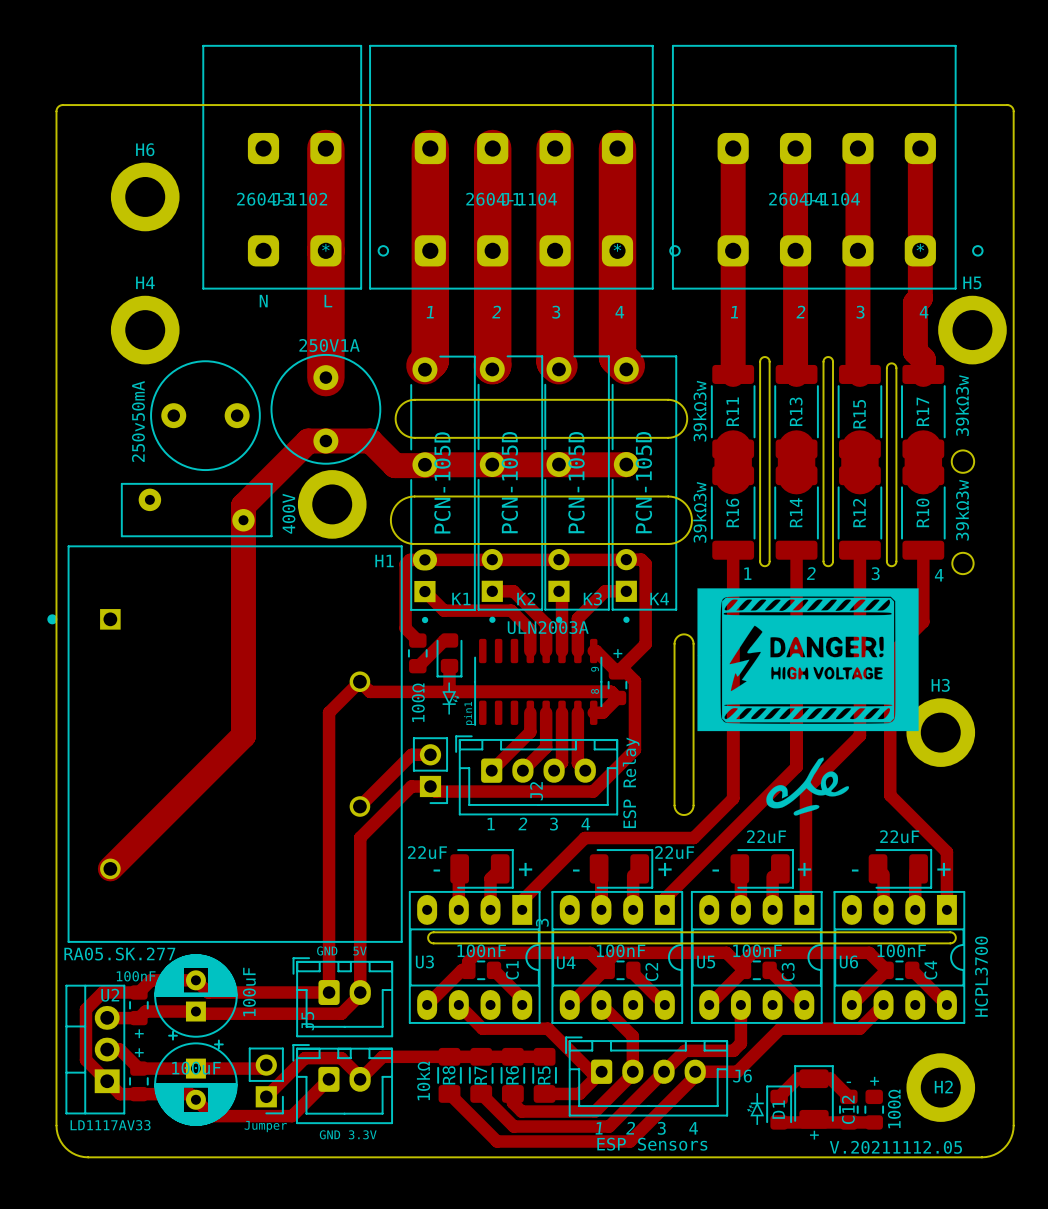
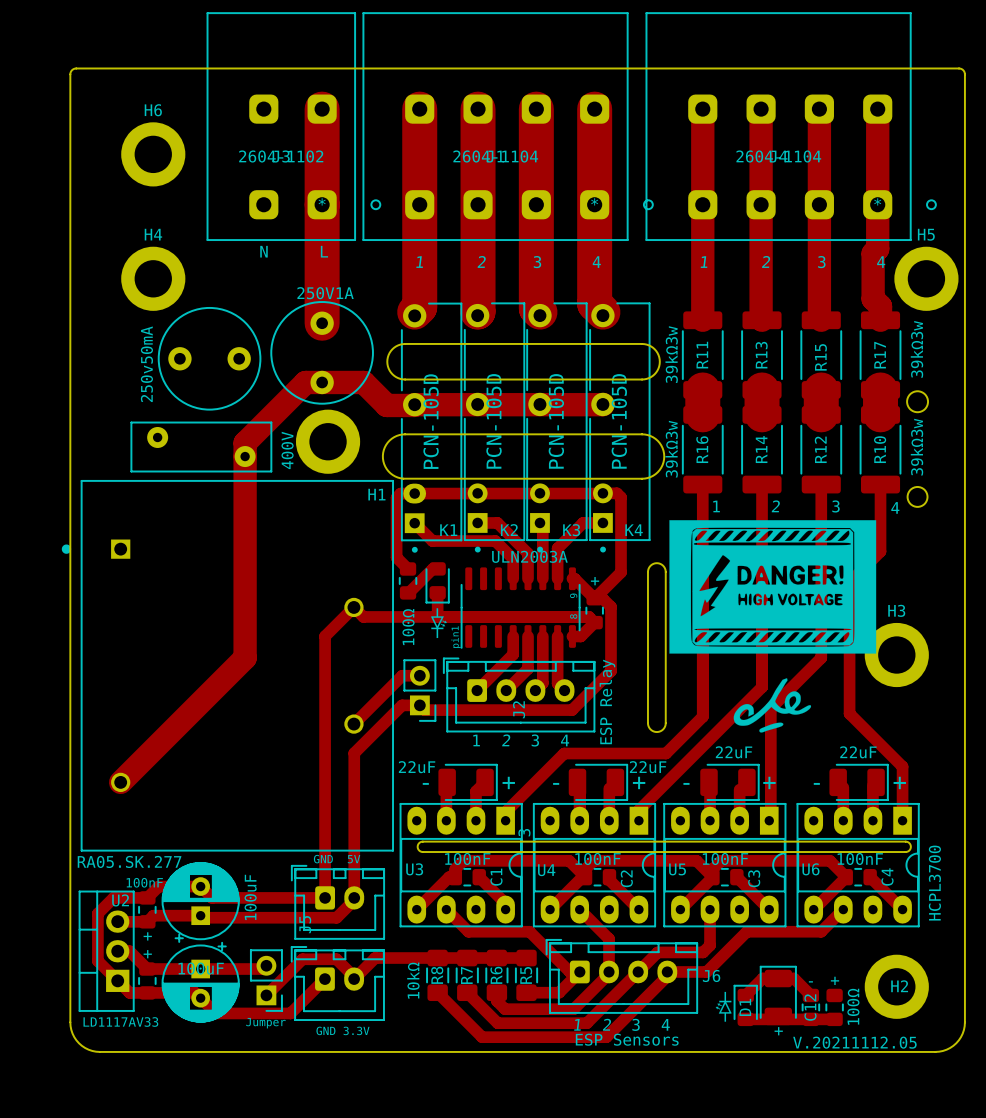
board edge: (760, 361) (760, 561) (764, 566) (769, 561) (769, 361) (764, 357) (760, 361) -> none
board edge: (823, 361) (823, 561) (828, 566) (833, 561) (833, 361) (828, 357) (823, 361) -> none
board edge: (886, 368) (886, 561) (891, 566) (896, 561) (896, 368) (891, 363) (886, 368) -> none

